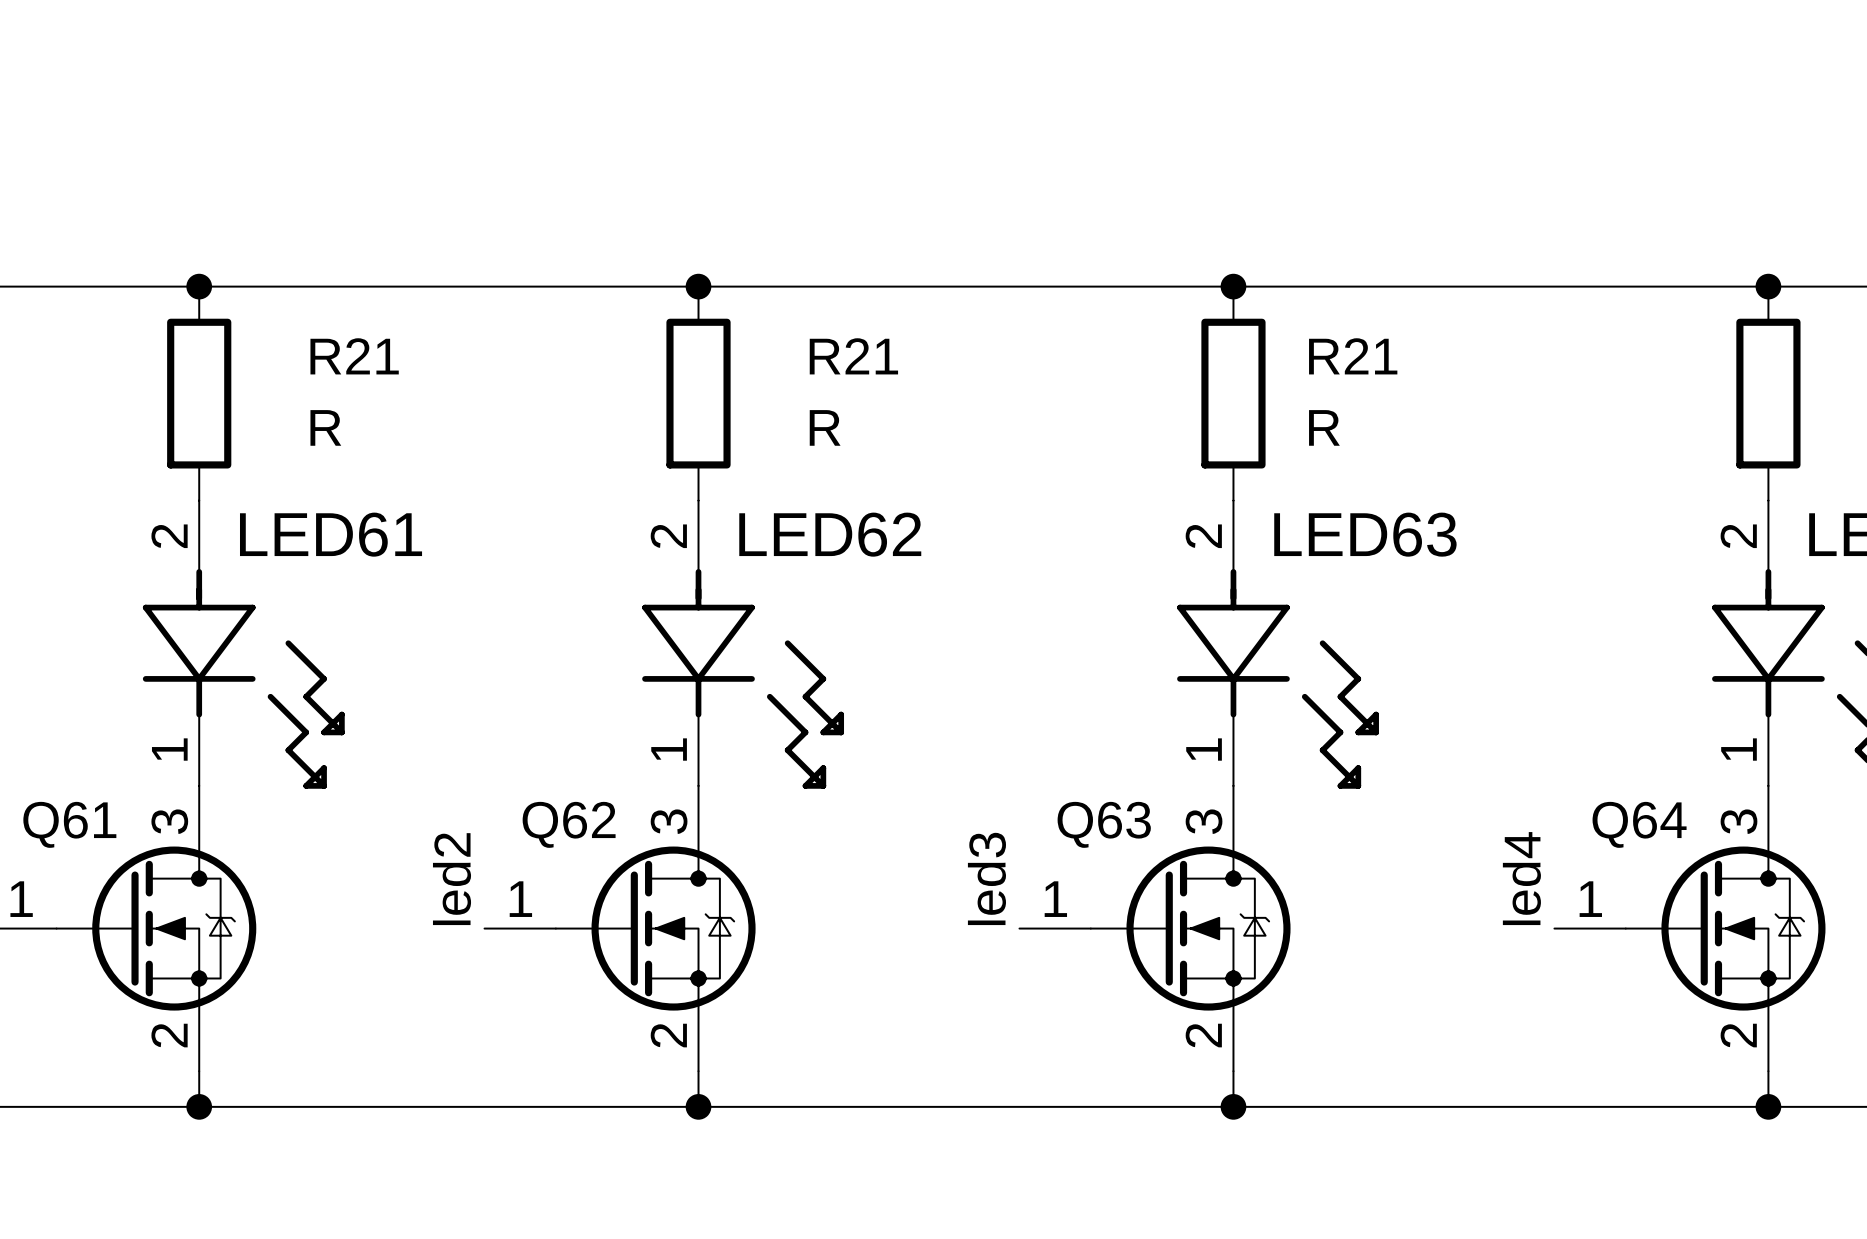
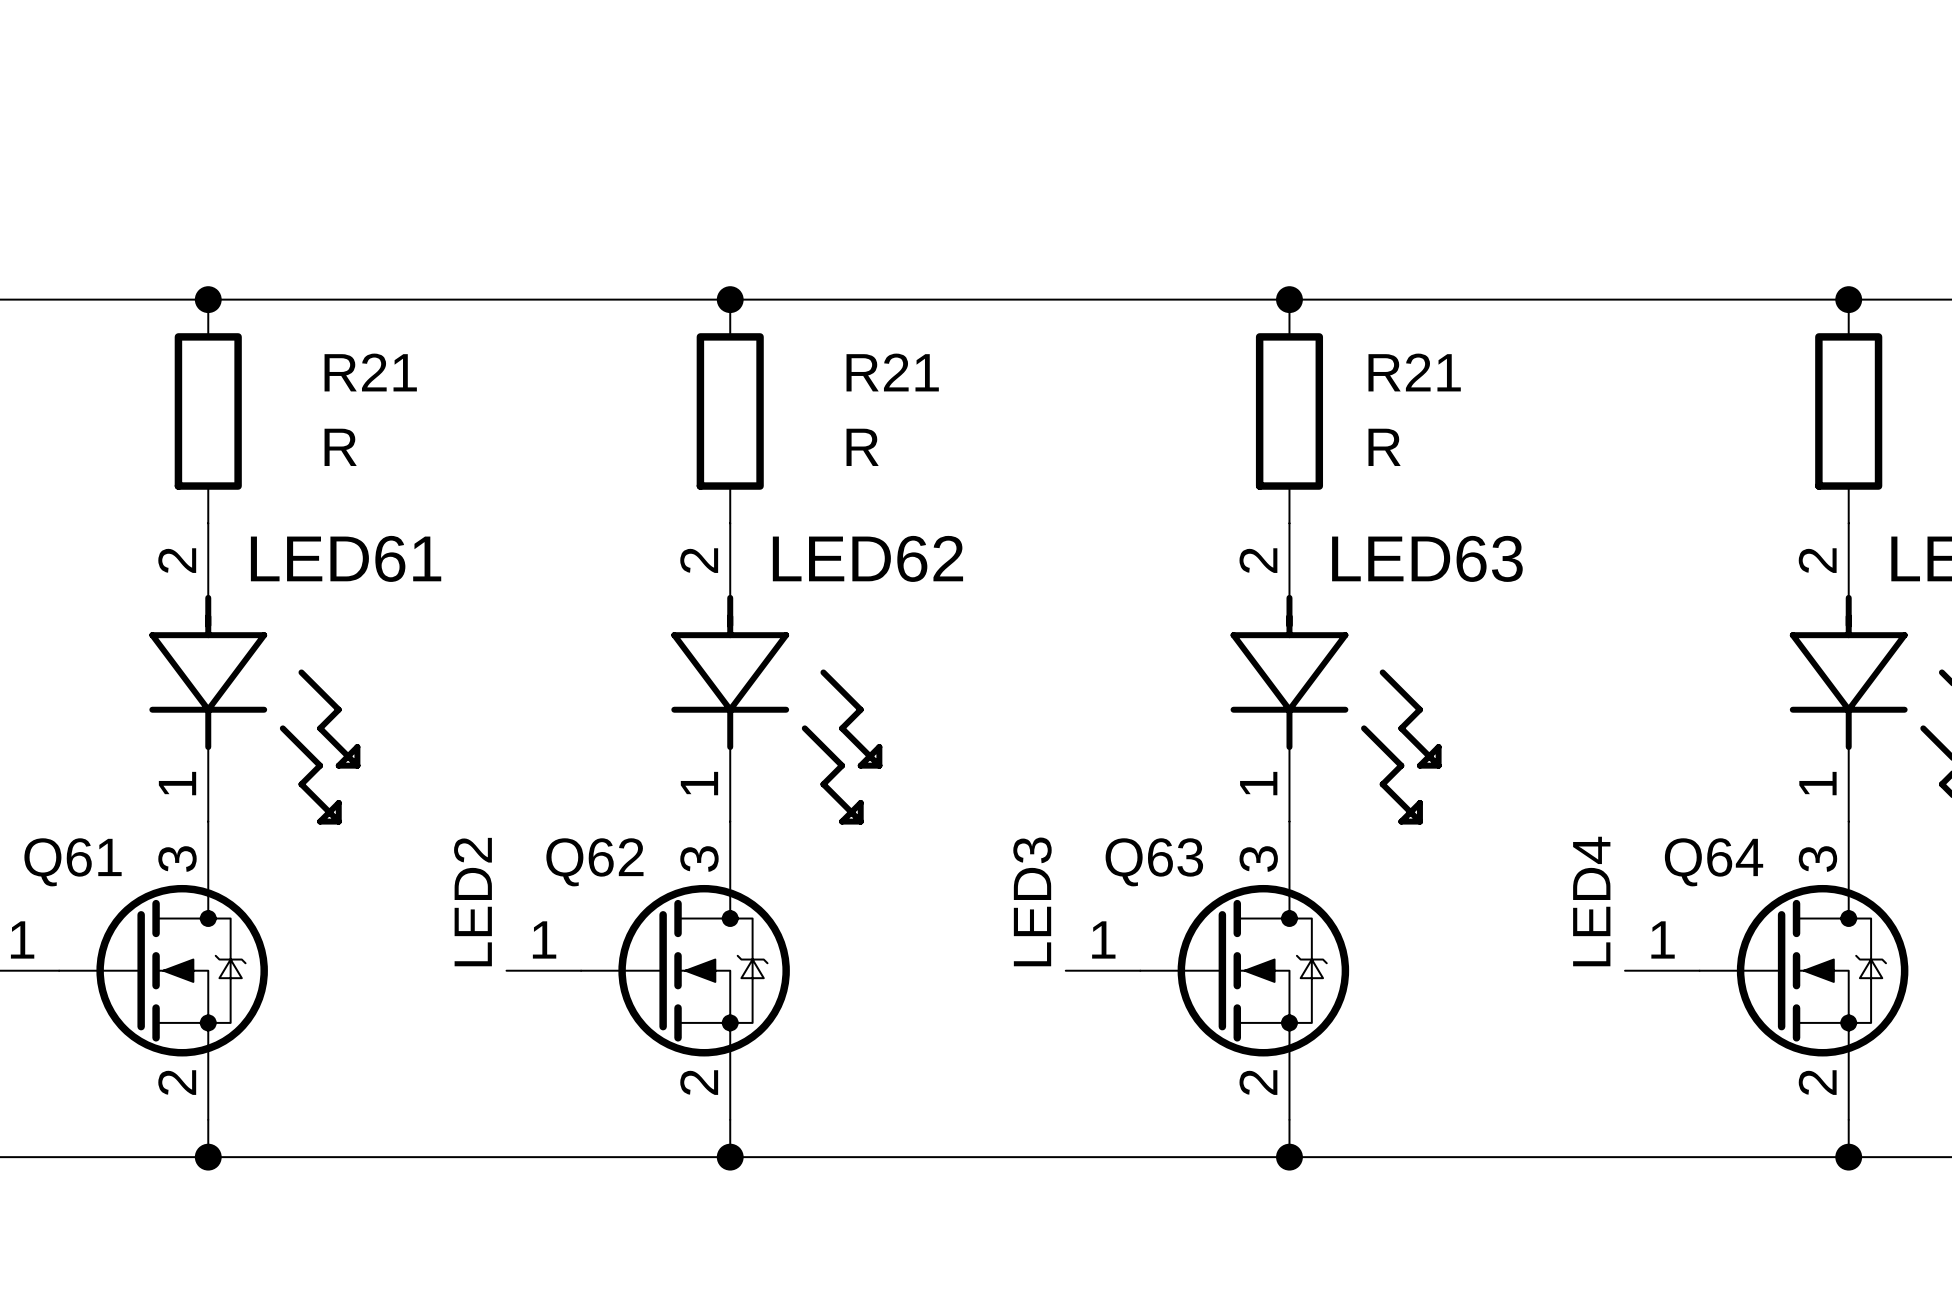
label: led3 (986, 878) -> LED3 (1032, 901)
label: led4 (1521, 878) -> LED4 (1591, 901)
label: led2 (452, 879) -> LED2 (472, 902)

